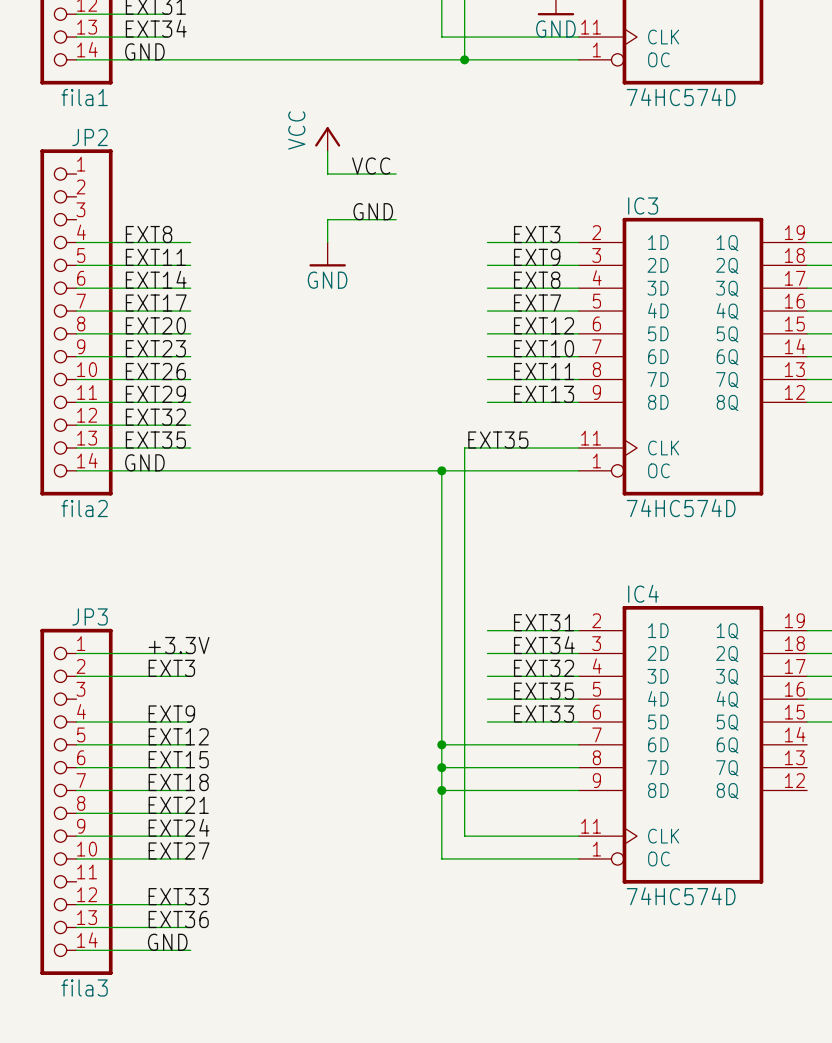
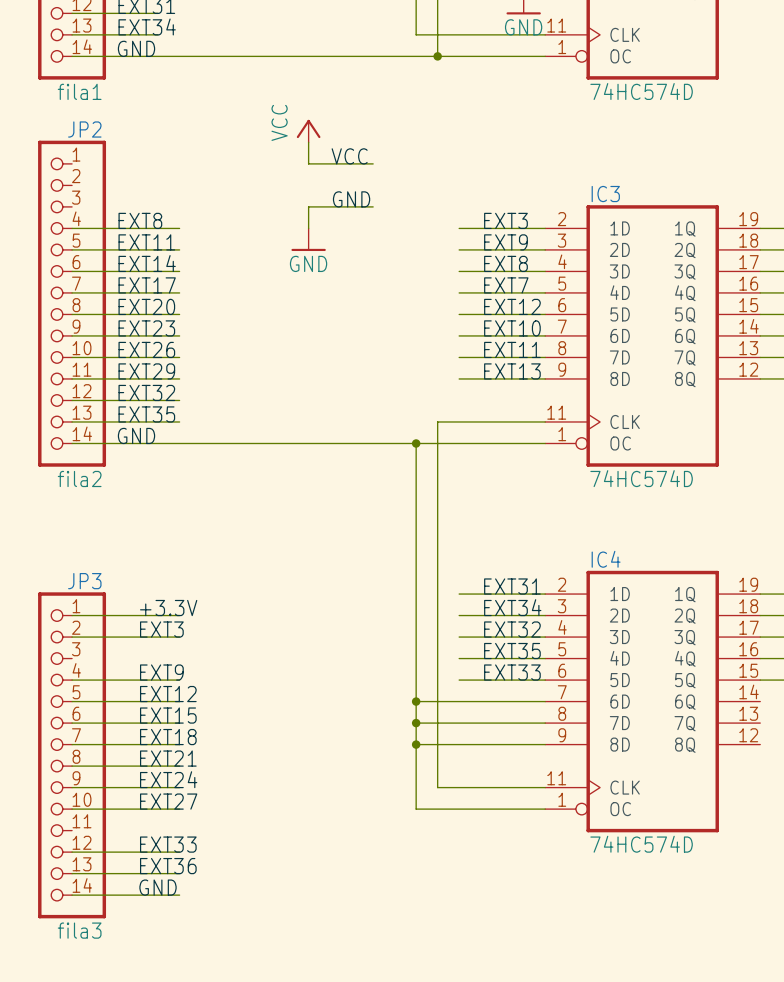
label: EXT35 (498, 440) -> none

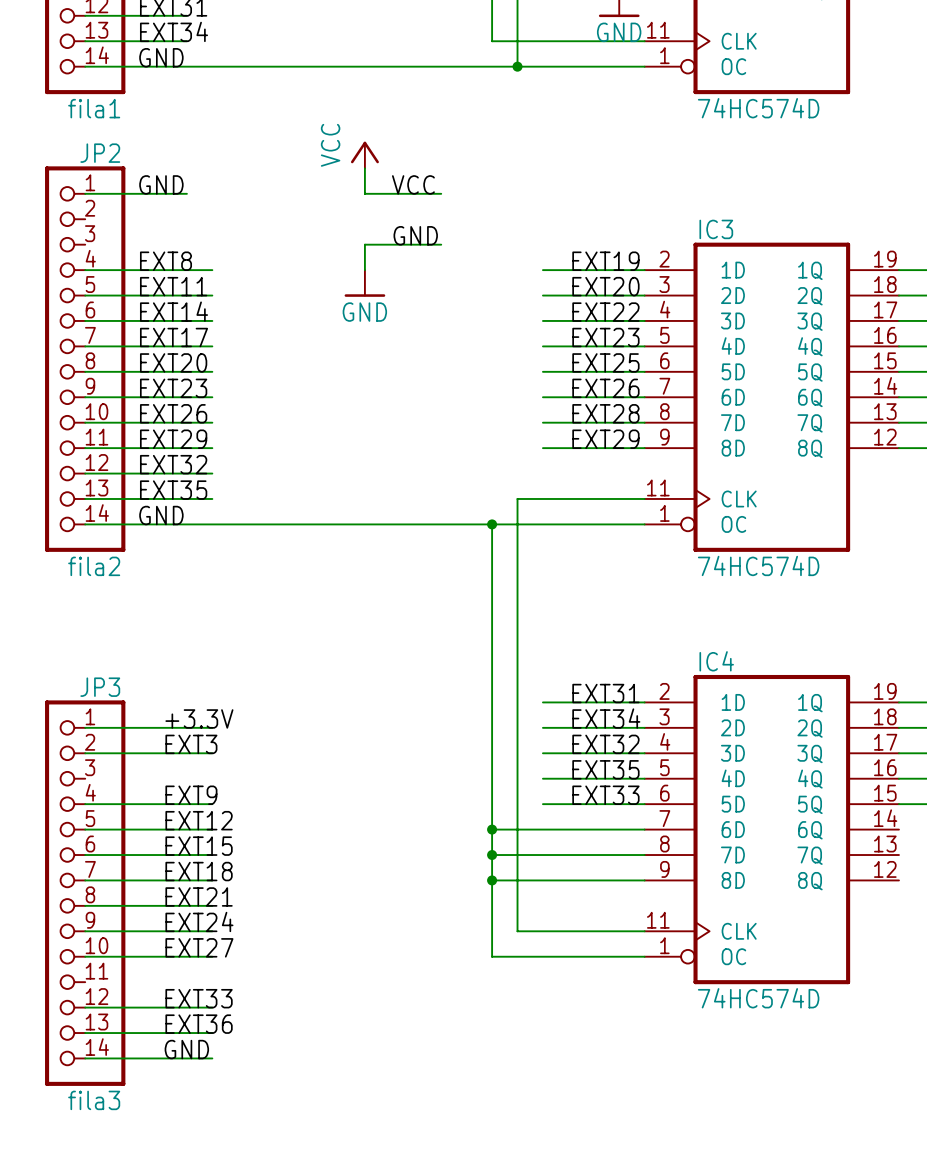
label: none -> GND (161, 184)
wire: none -> (85, 193) (186, 193)
label: EXT3 (505, 220) -> EXT19 (605, 261)
label: EXT9 (505, 242) -> EXT20 (605, 286)
label: EXT8 (505, 263) -> EXT22 (605, 312)
label: EXT7 (506, 285) -> EXT23 (605, 337)
label: EXT12 (512, 306) -> EXT25 (605, 362)
label: EXT10 (512, 328) -> EXT26 (605, 388)
label: EXT11 (512, 349) -> EXT28 (605, 413)
label: EXT13 (512, 371) -> EXT29 (605, 439)

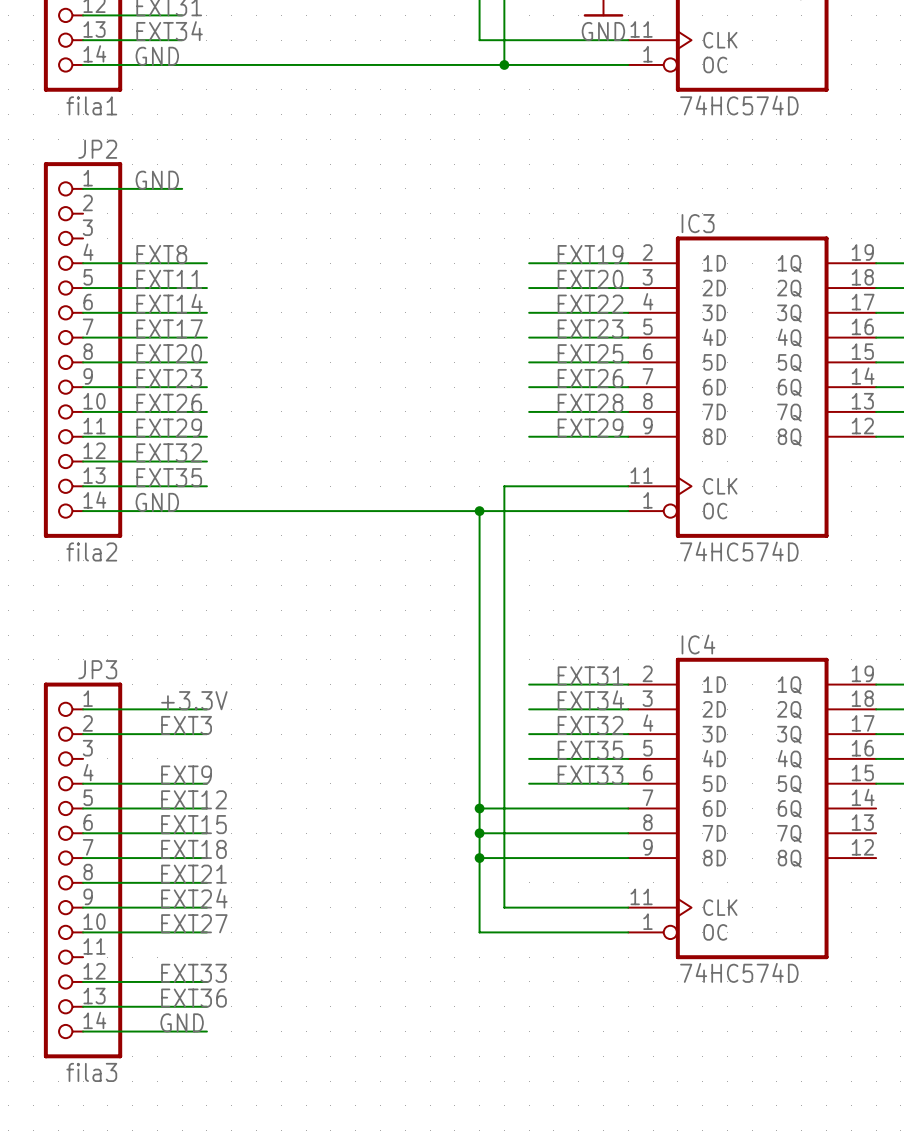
power symbol: VCC (364, 155) -> none
wire: (364, 168) (364, 193) (441, 193) -> none
label: VCC (413, 184) -> none
label: GND (415, 235) -> none
wire: (441, 244) (364, 244) (364, 270) -> none
power symbol: GND (364, 283) -> none

